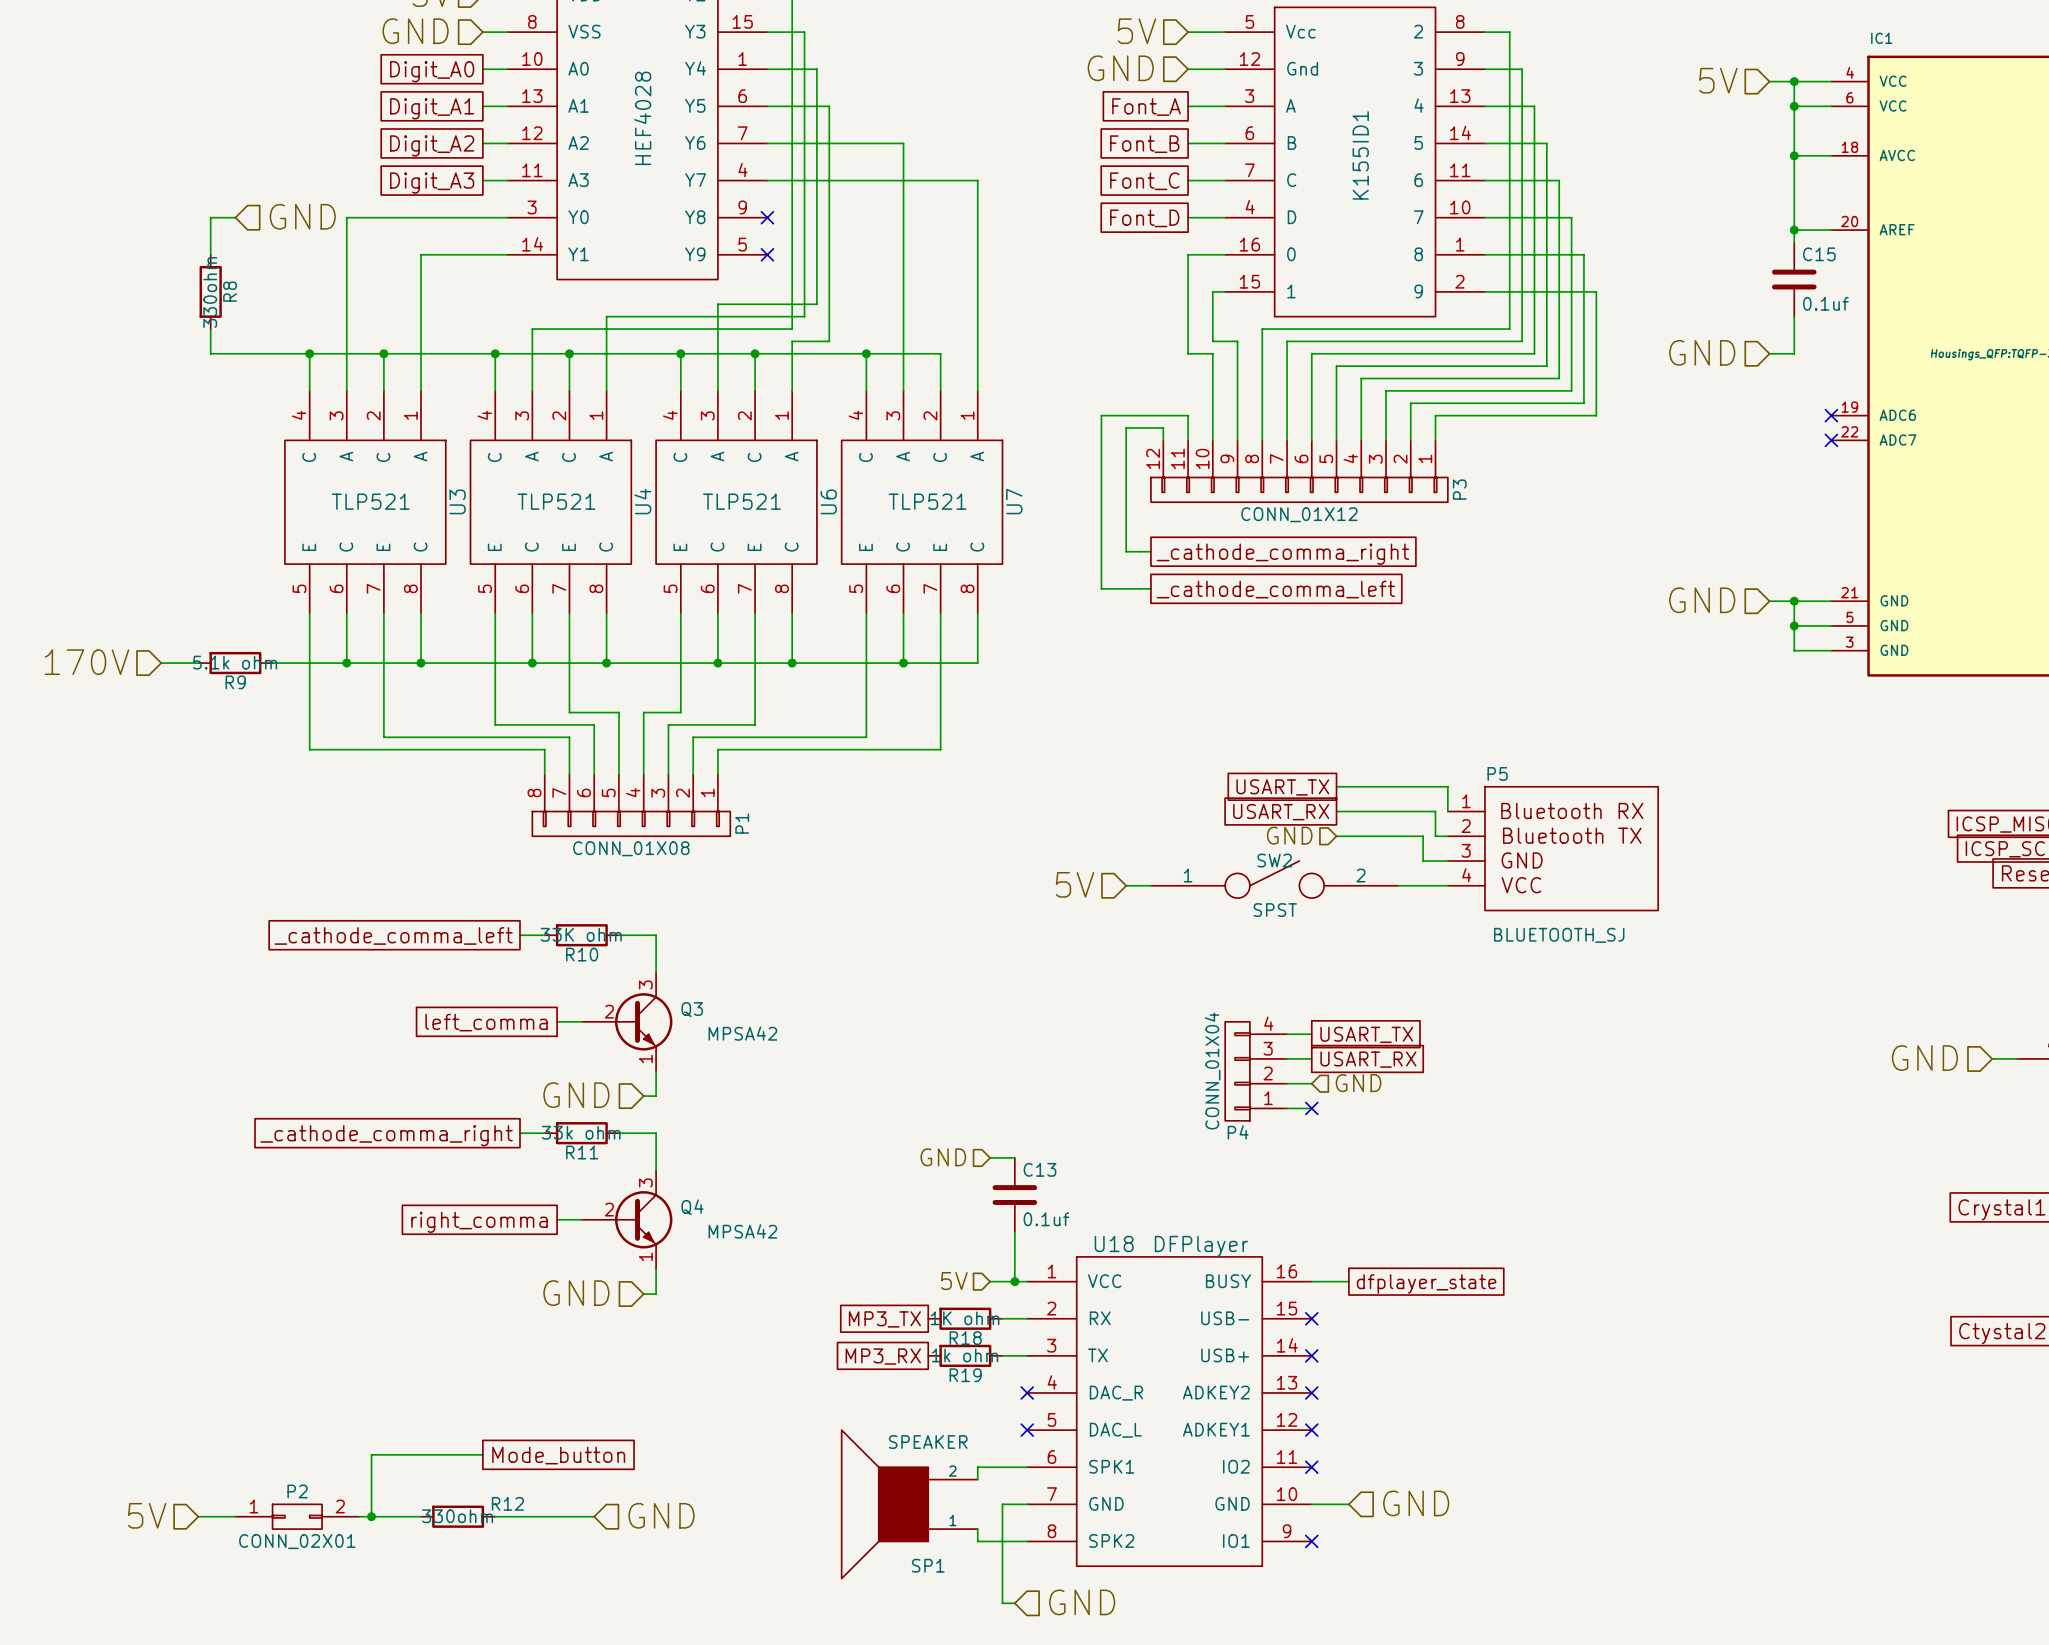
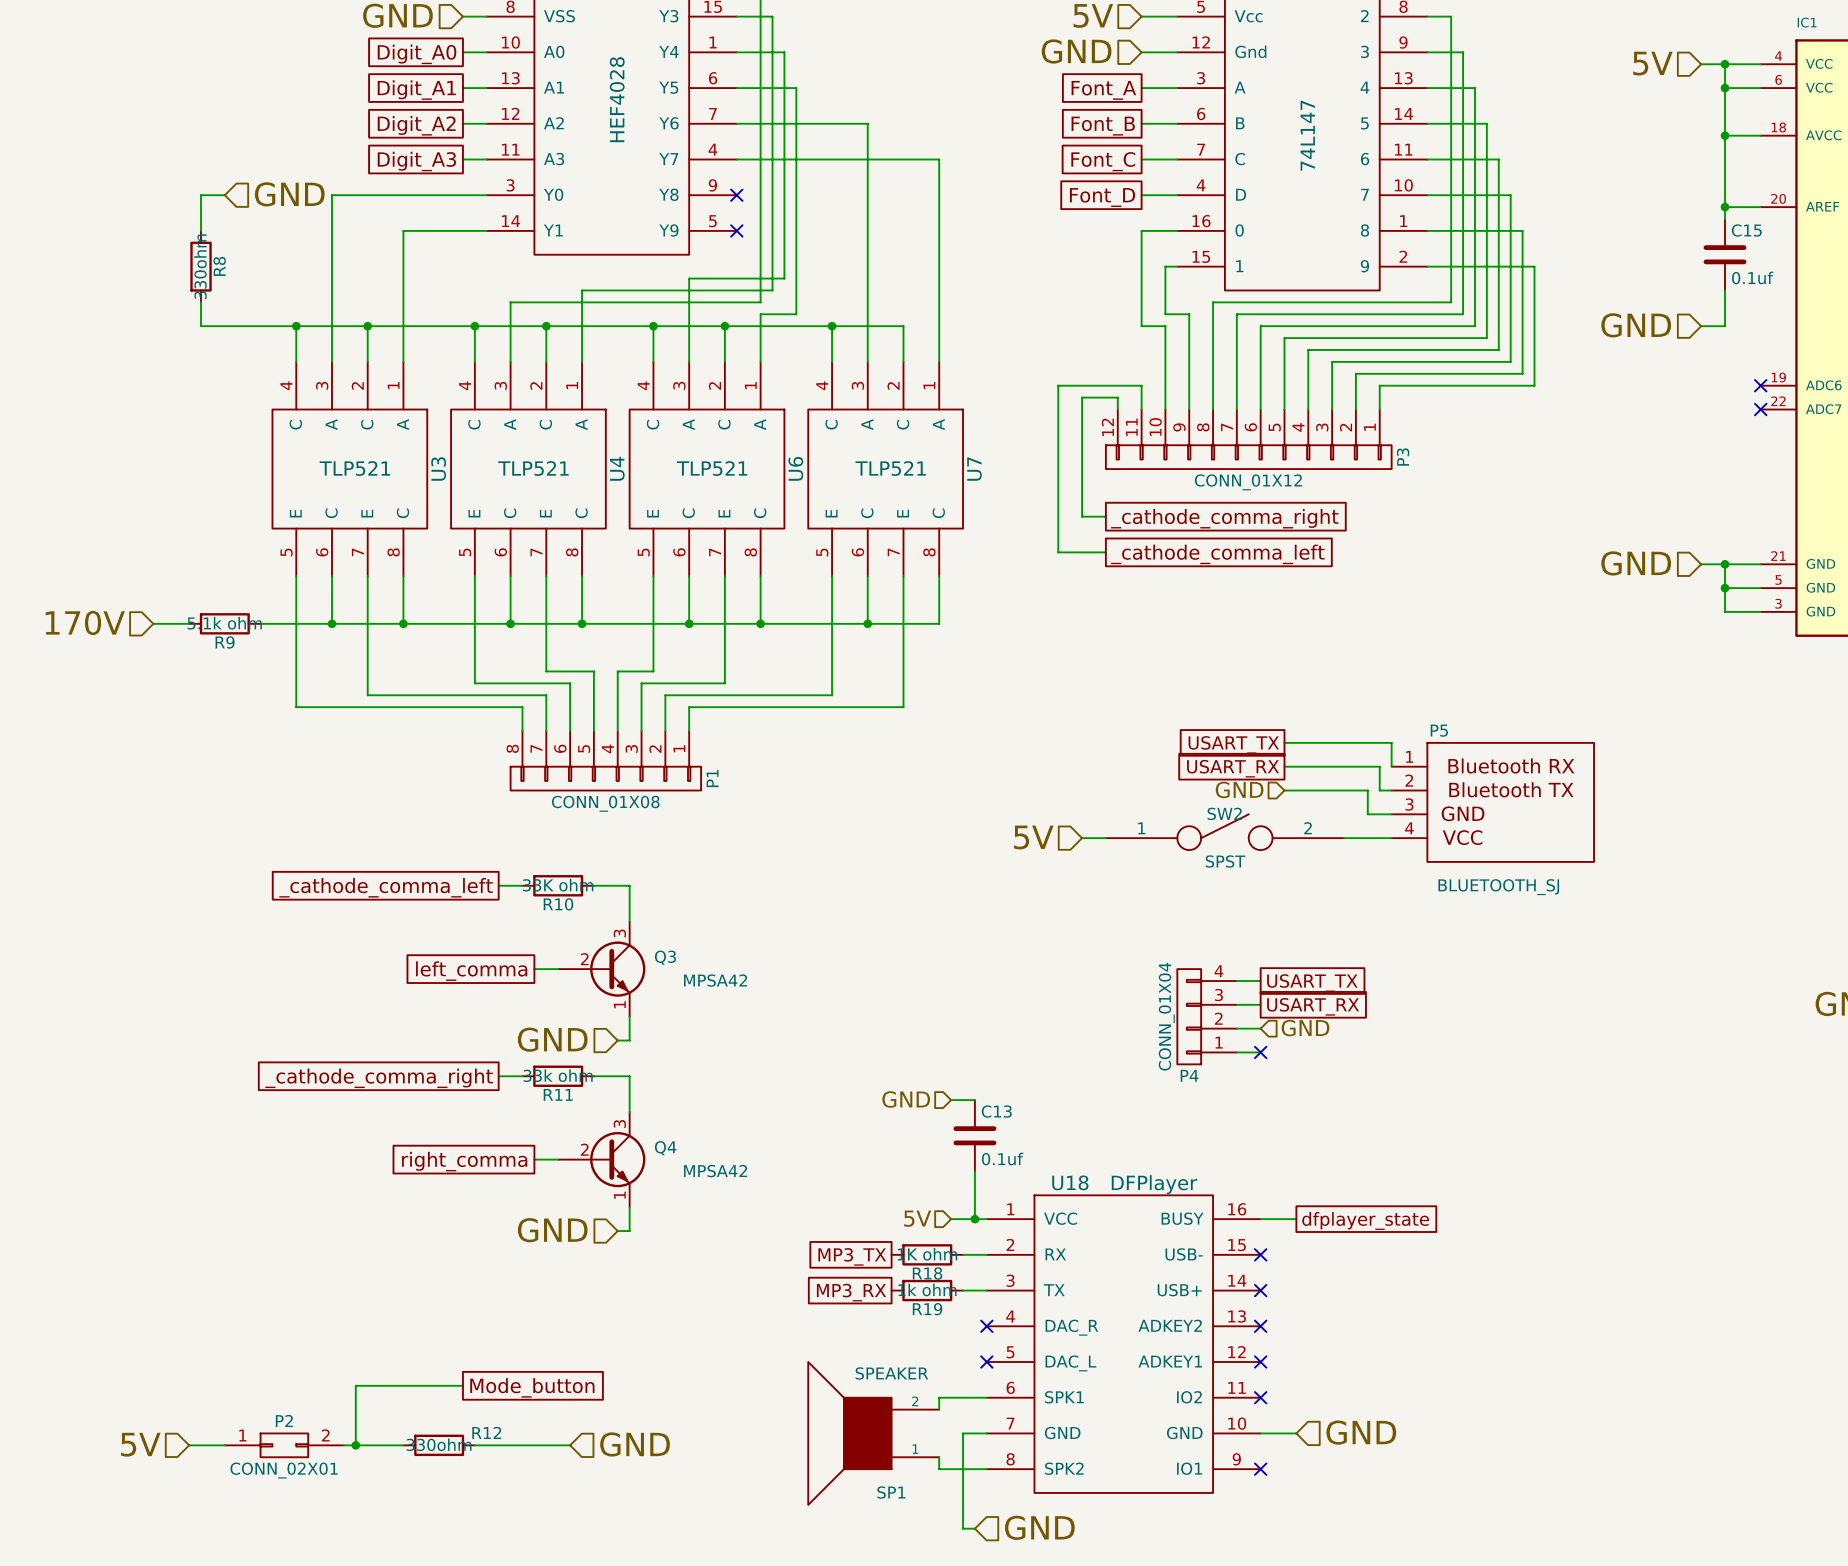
part value: K155ID1 (1360, 155) -> 74L147 (1307, 135)

